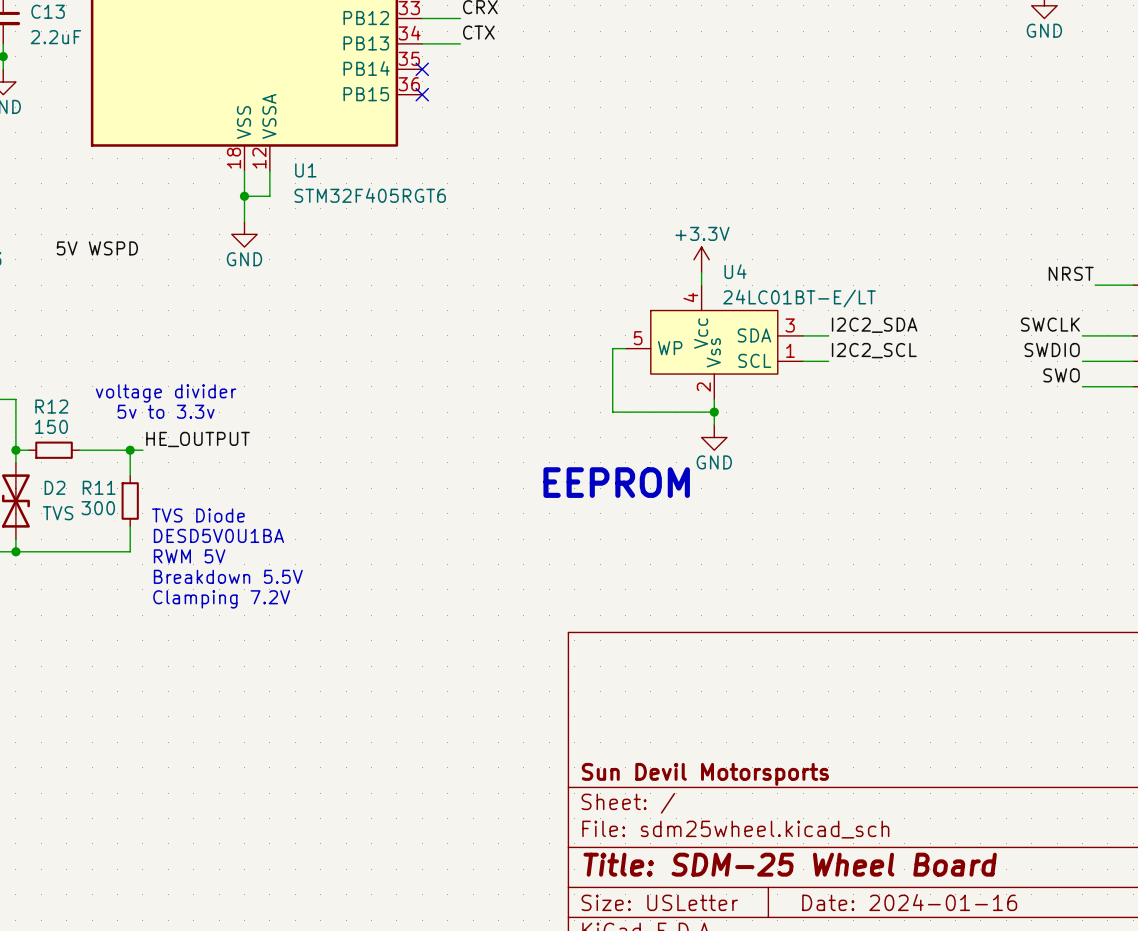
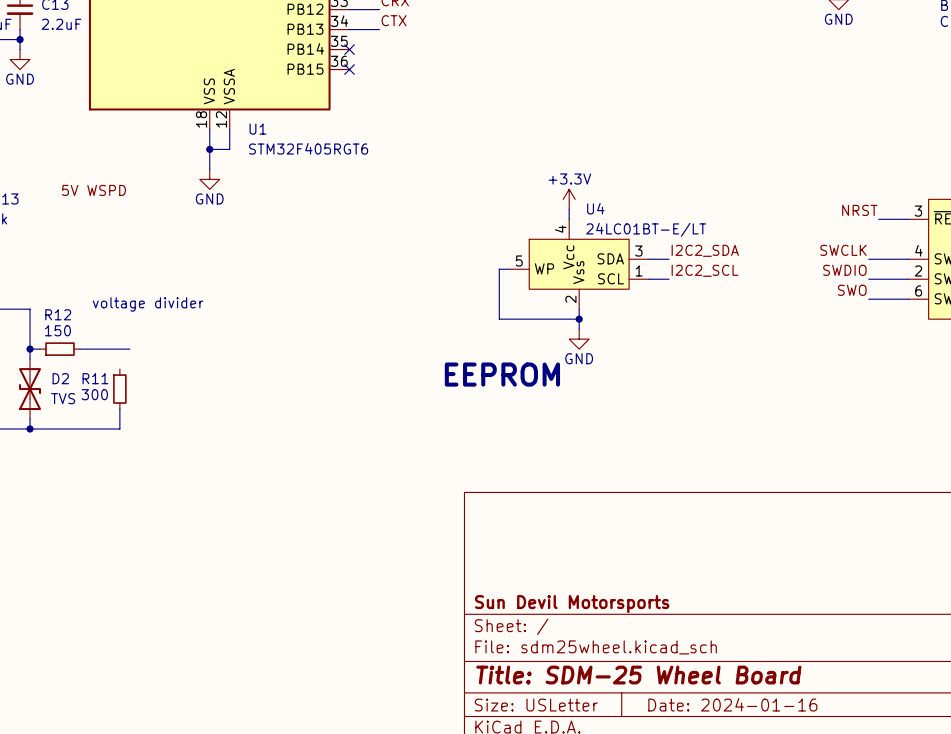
text: 5v to 3.3v (166, 411) -> none
label: HE_OUTPUT (198, 439) -> none
wire: (130, 450) (130, 475) -> none
junction: (130, 450) -> none
text: TVS Diode (198, 515) -> none
text: DESD5V0U1BA (218, 535) -> none
text: RWM 5V (189, 556) -> none
text: Breakdown 5.5V (228, 576) -> none
text: Clamping 7.2V (221, 599) -> none

